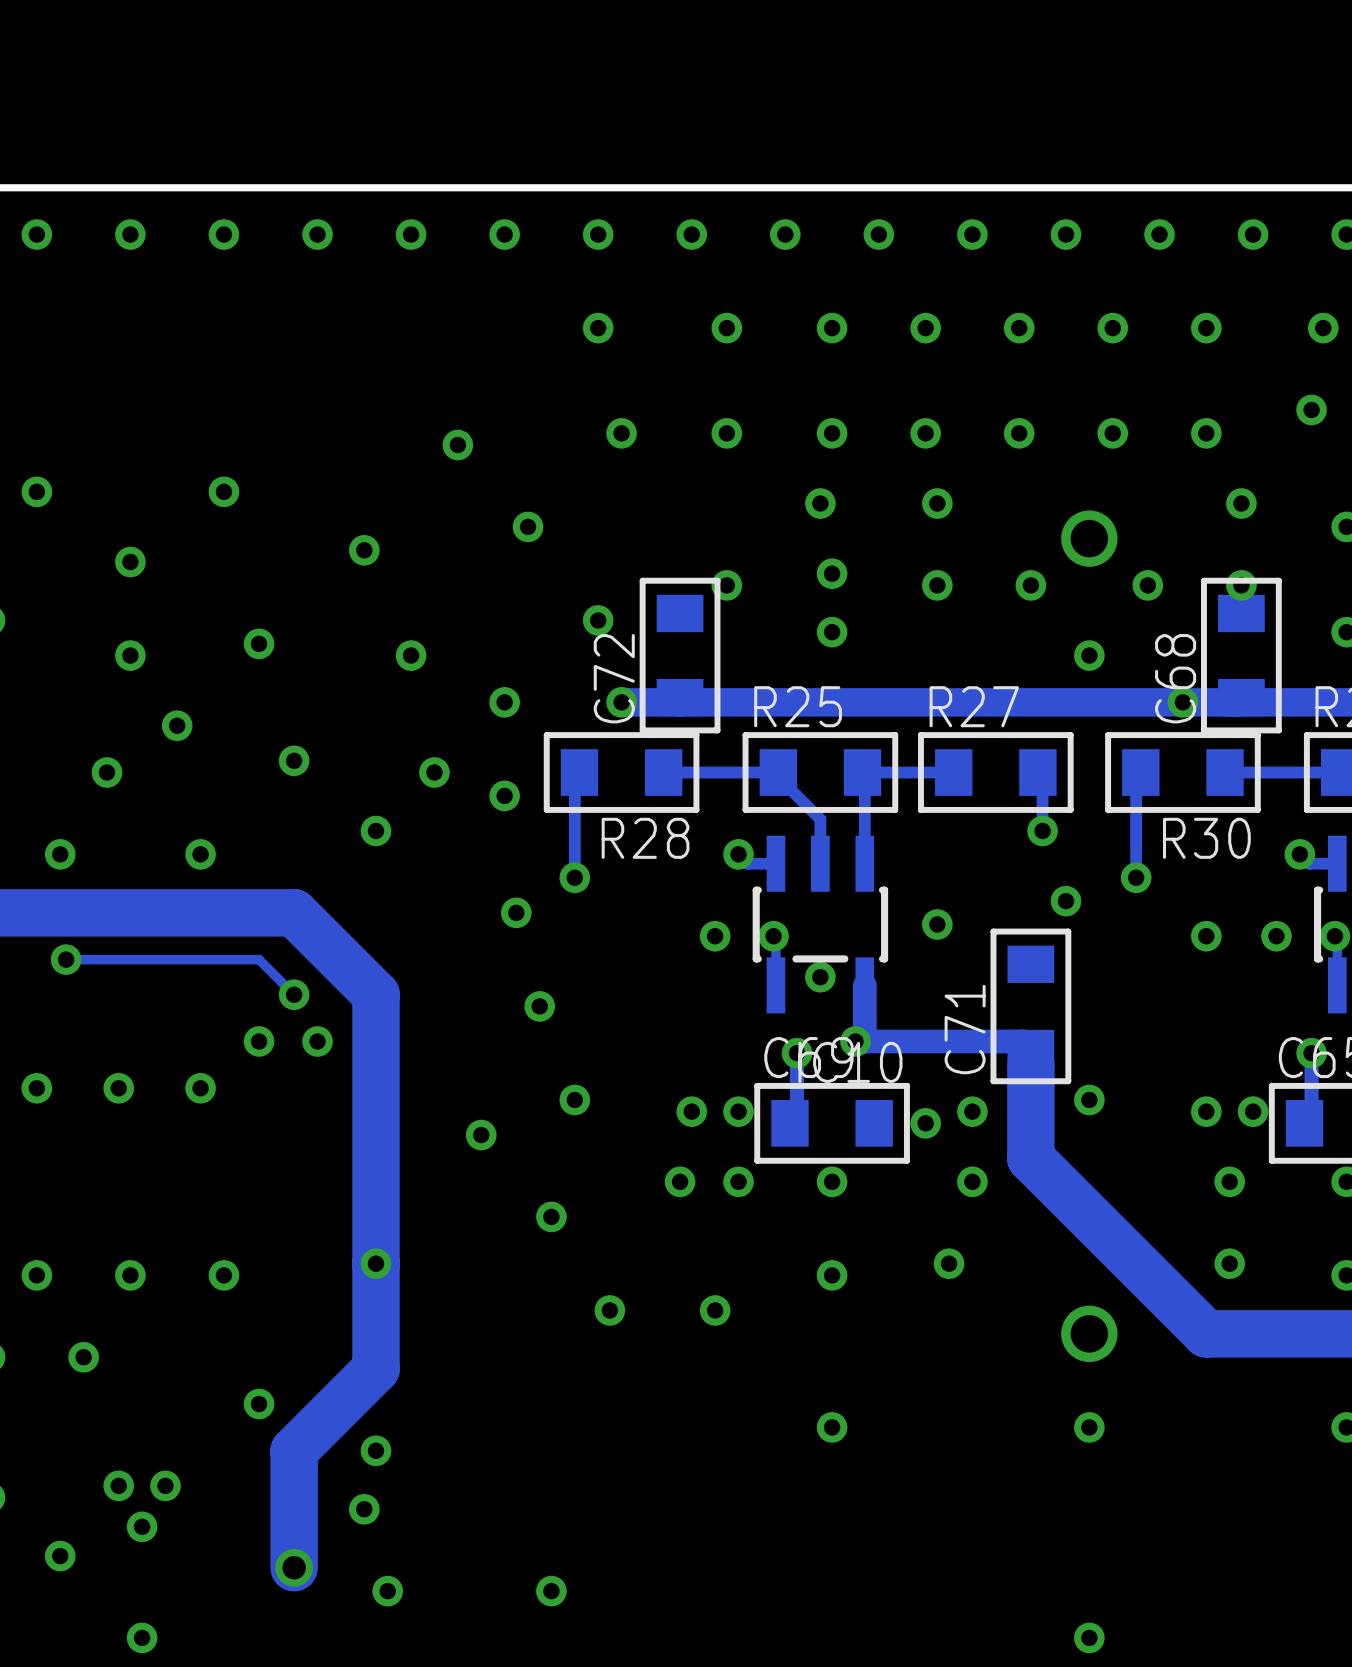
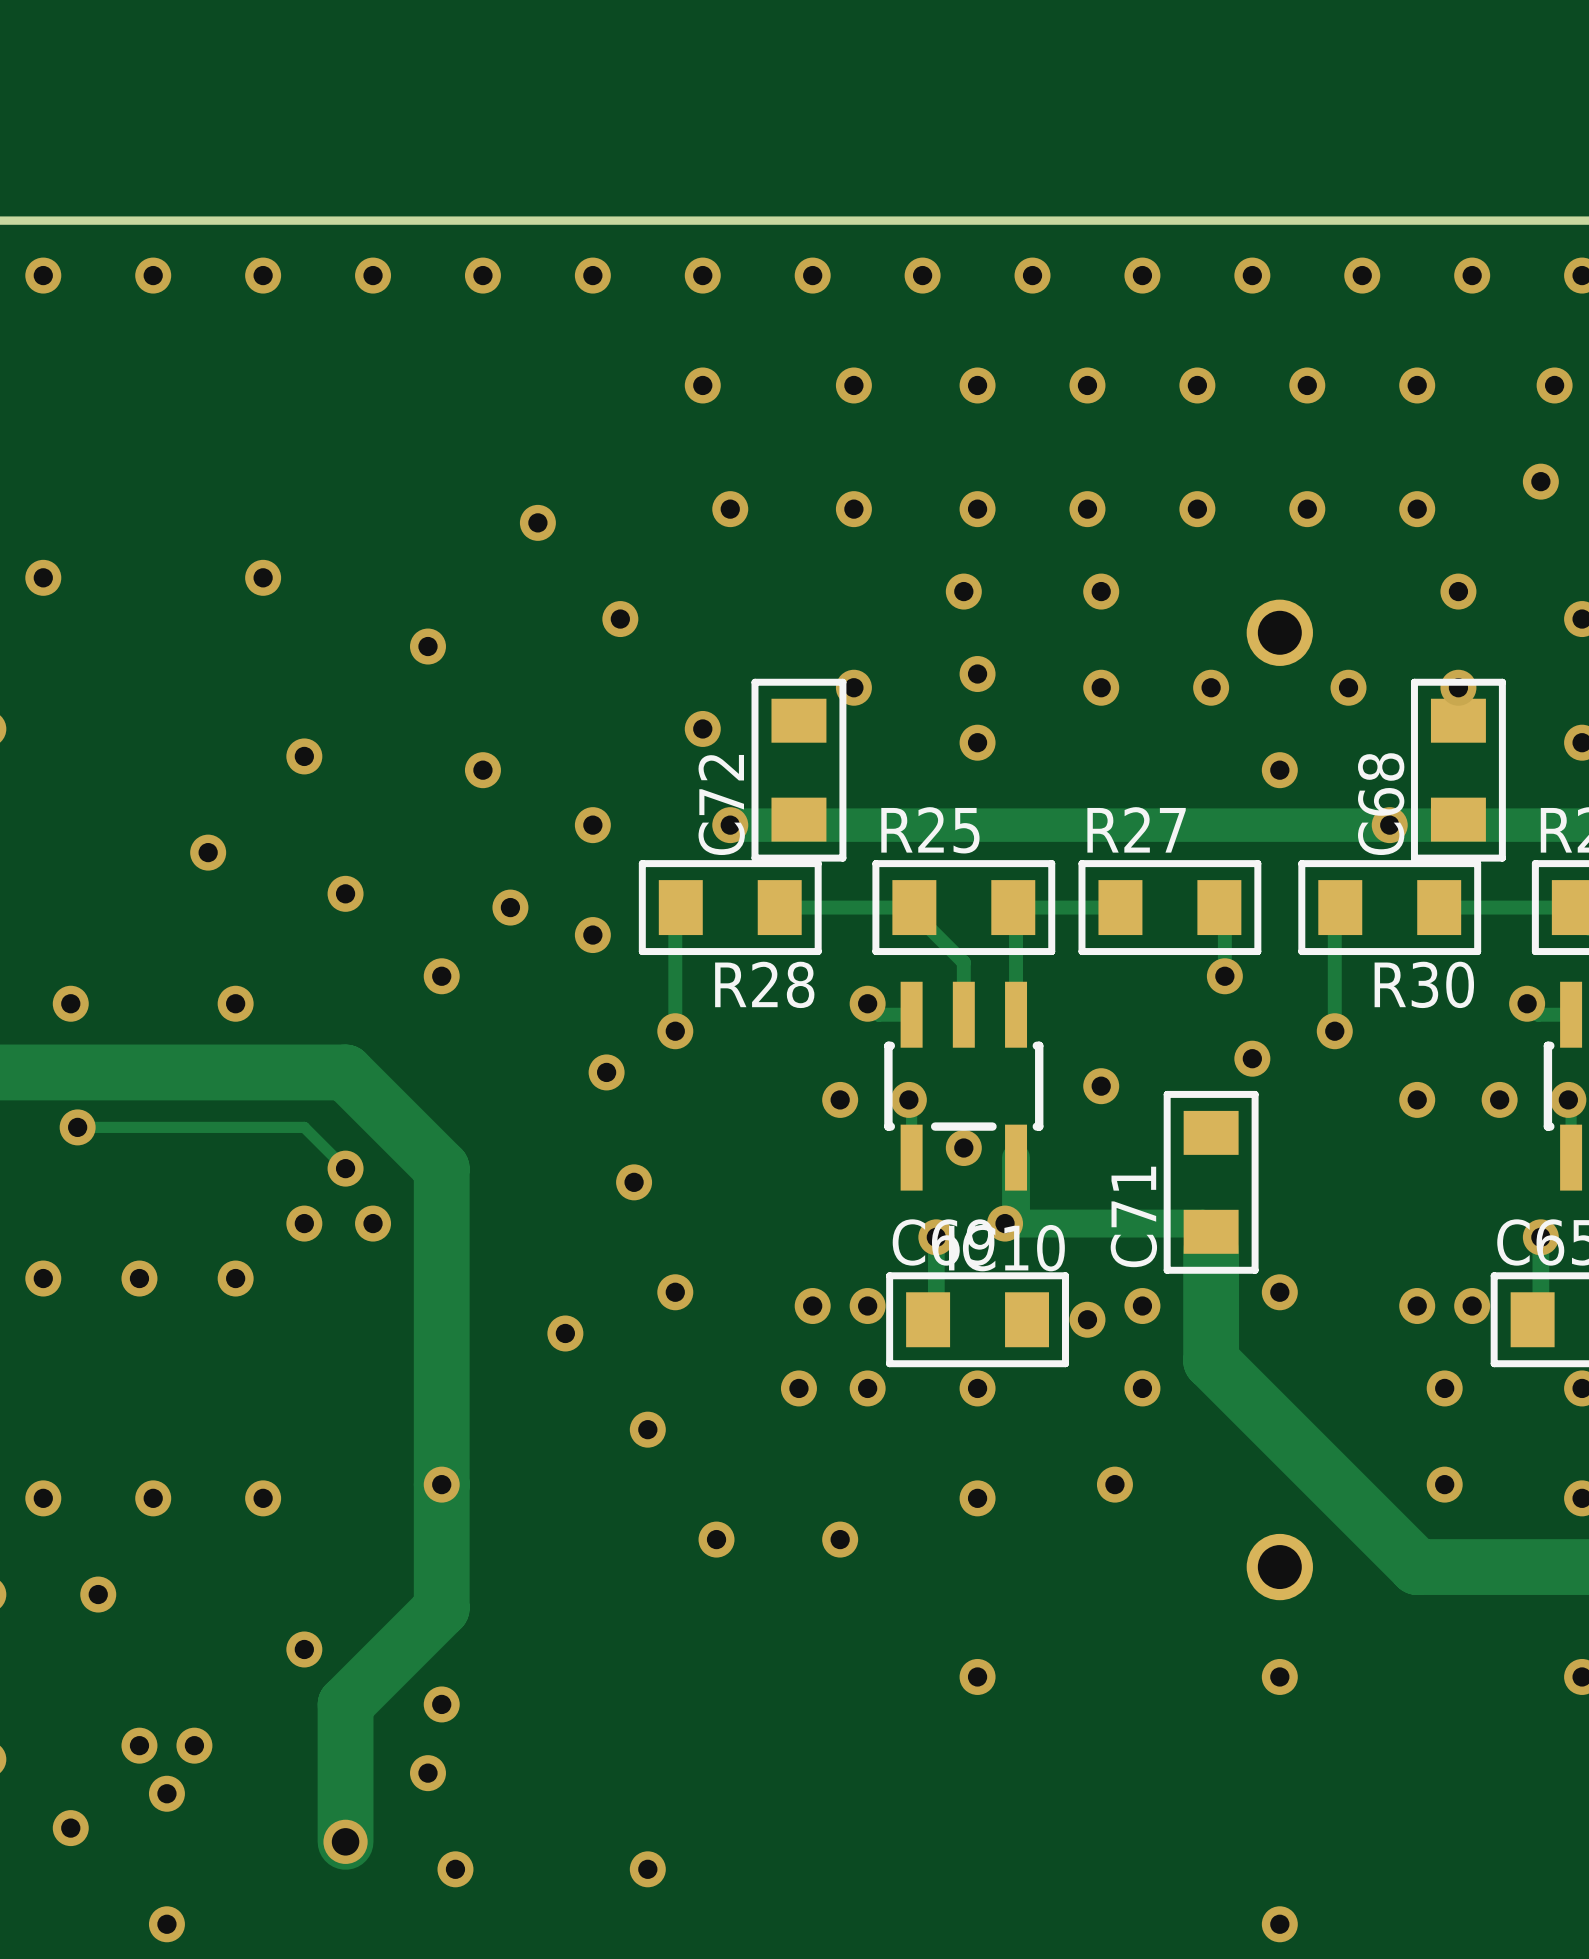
via: (130, 562) -> none
via: (130, 655) -> none
via: (107, 772) -> none

